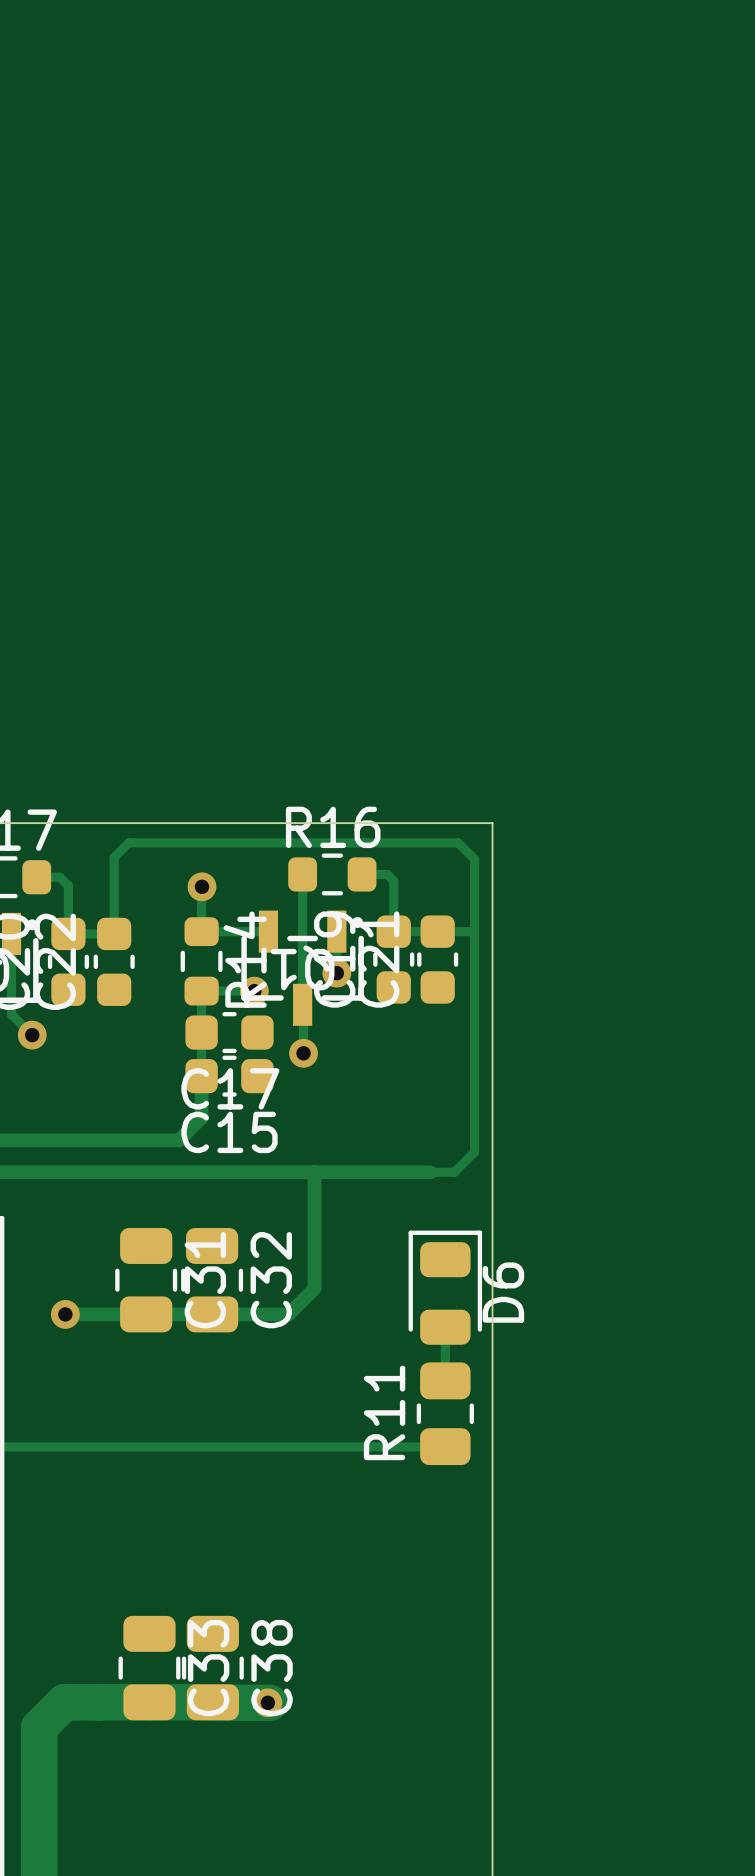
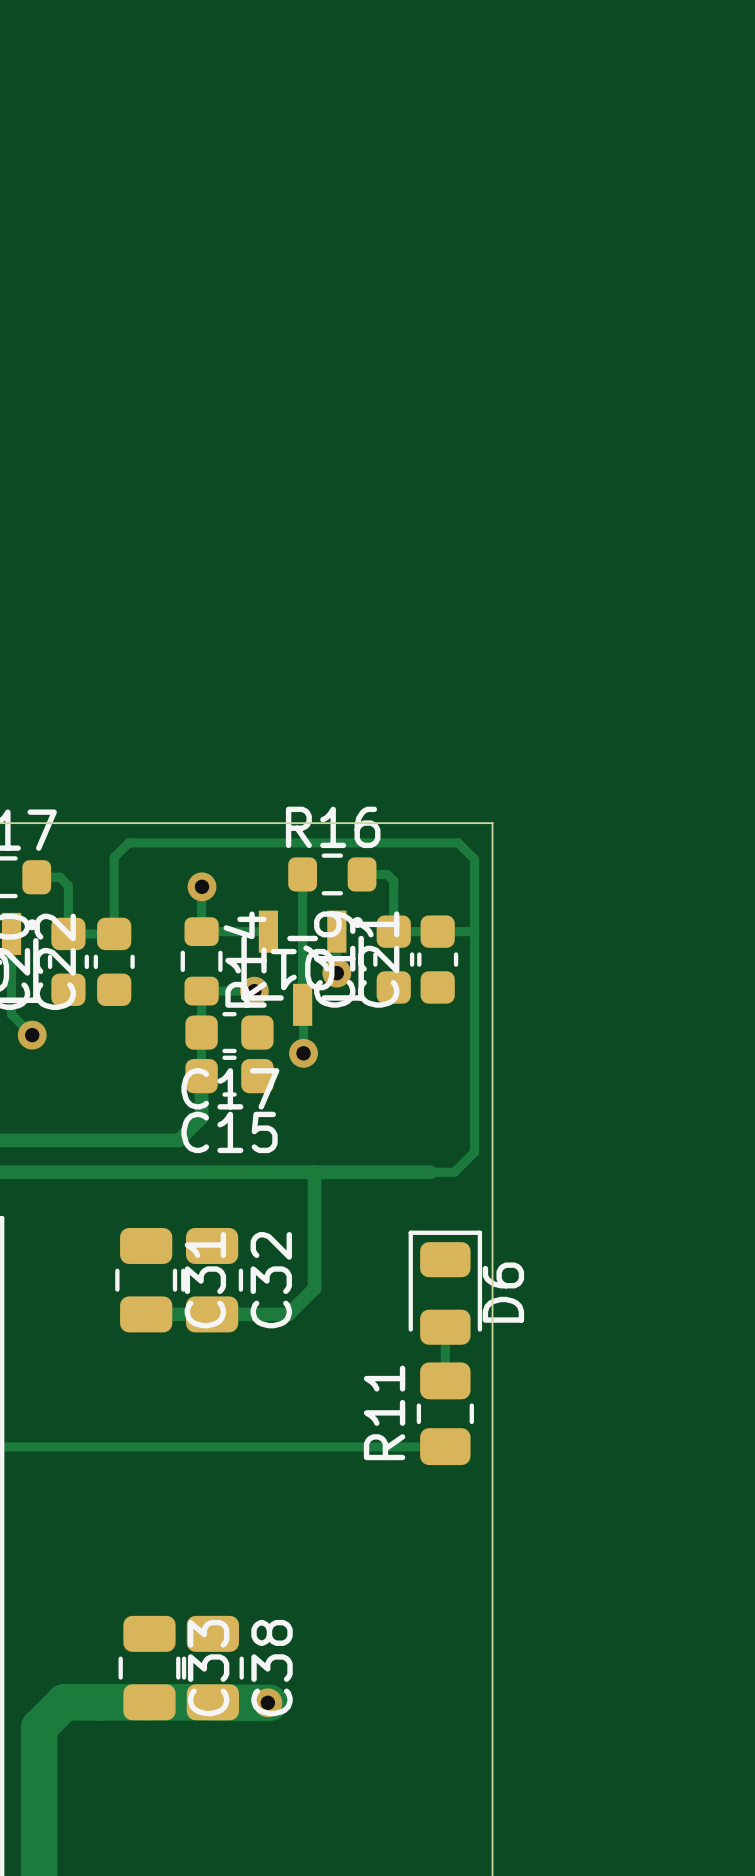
track: (65, 1314) (146, 1314) -> none
via: (65, 1314) -> none

